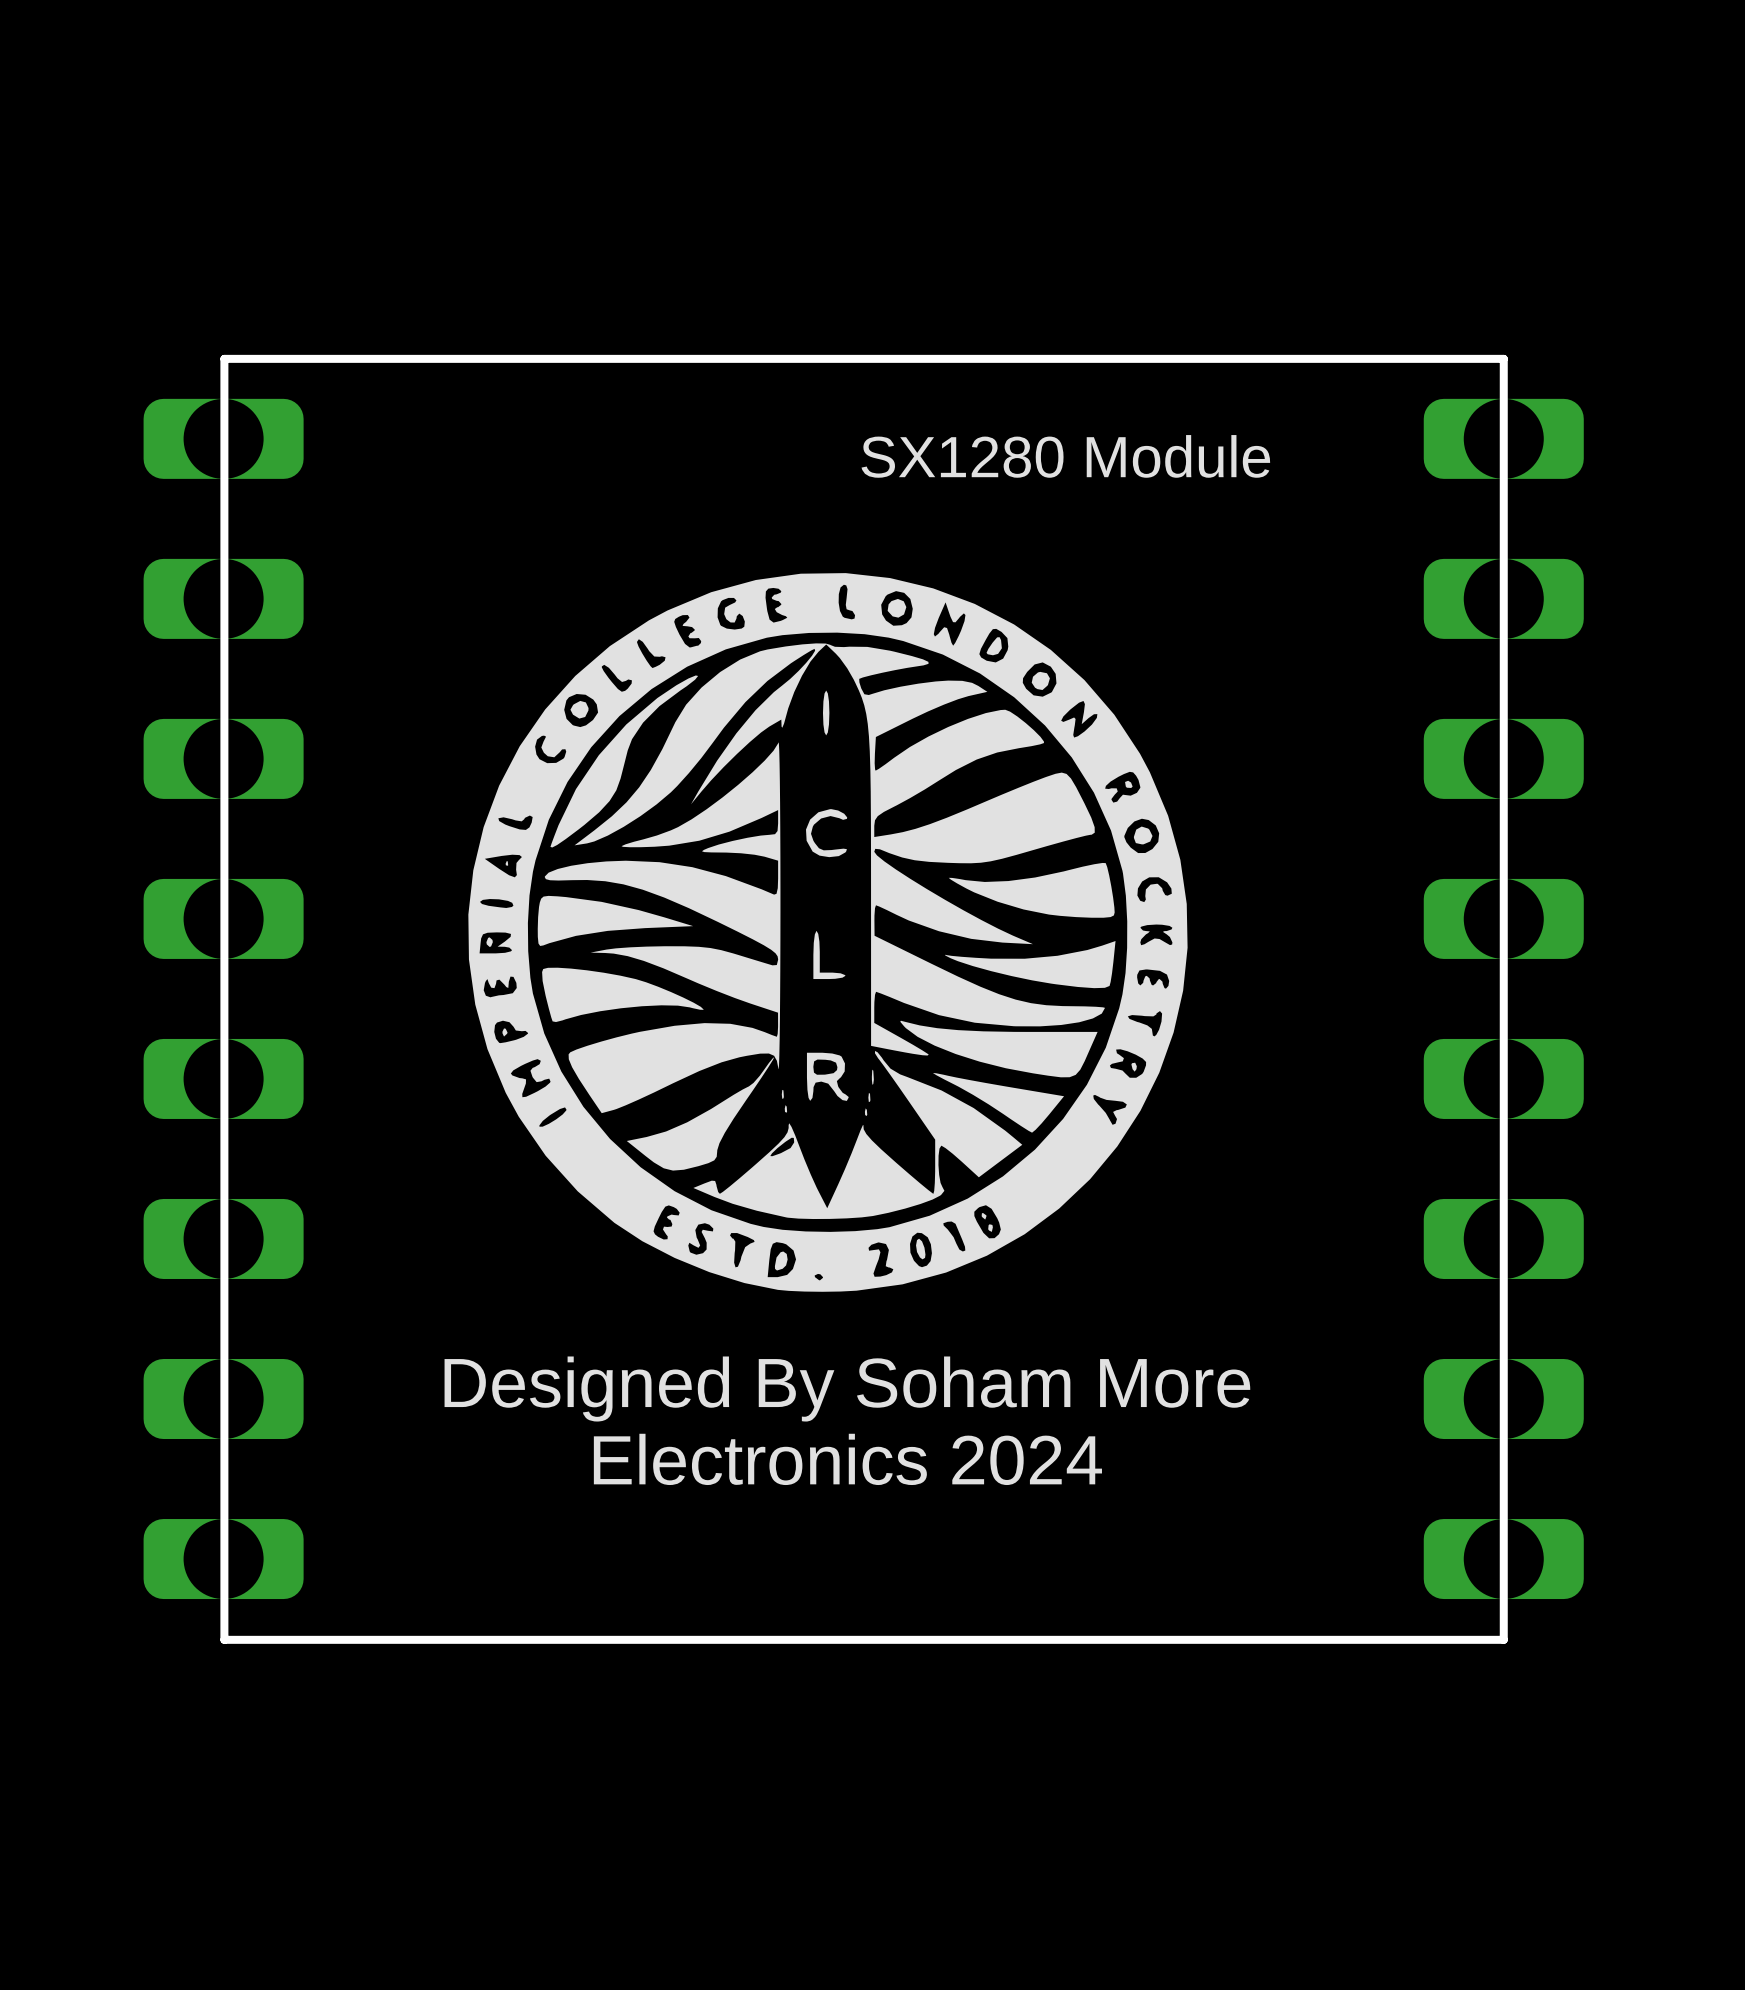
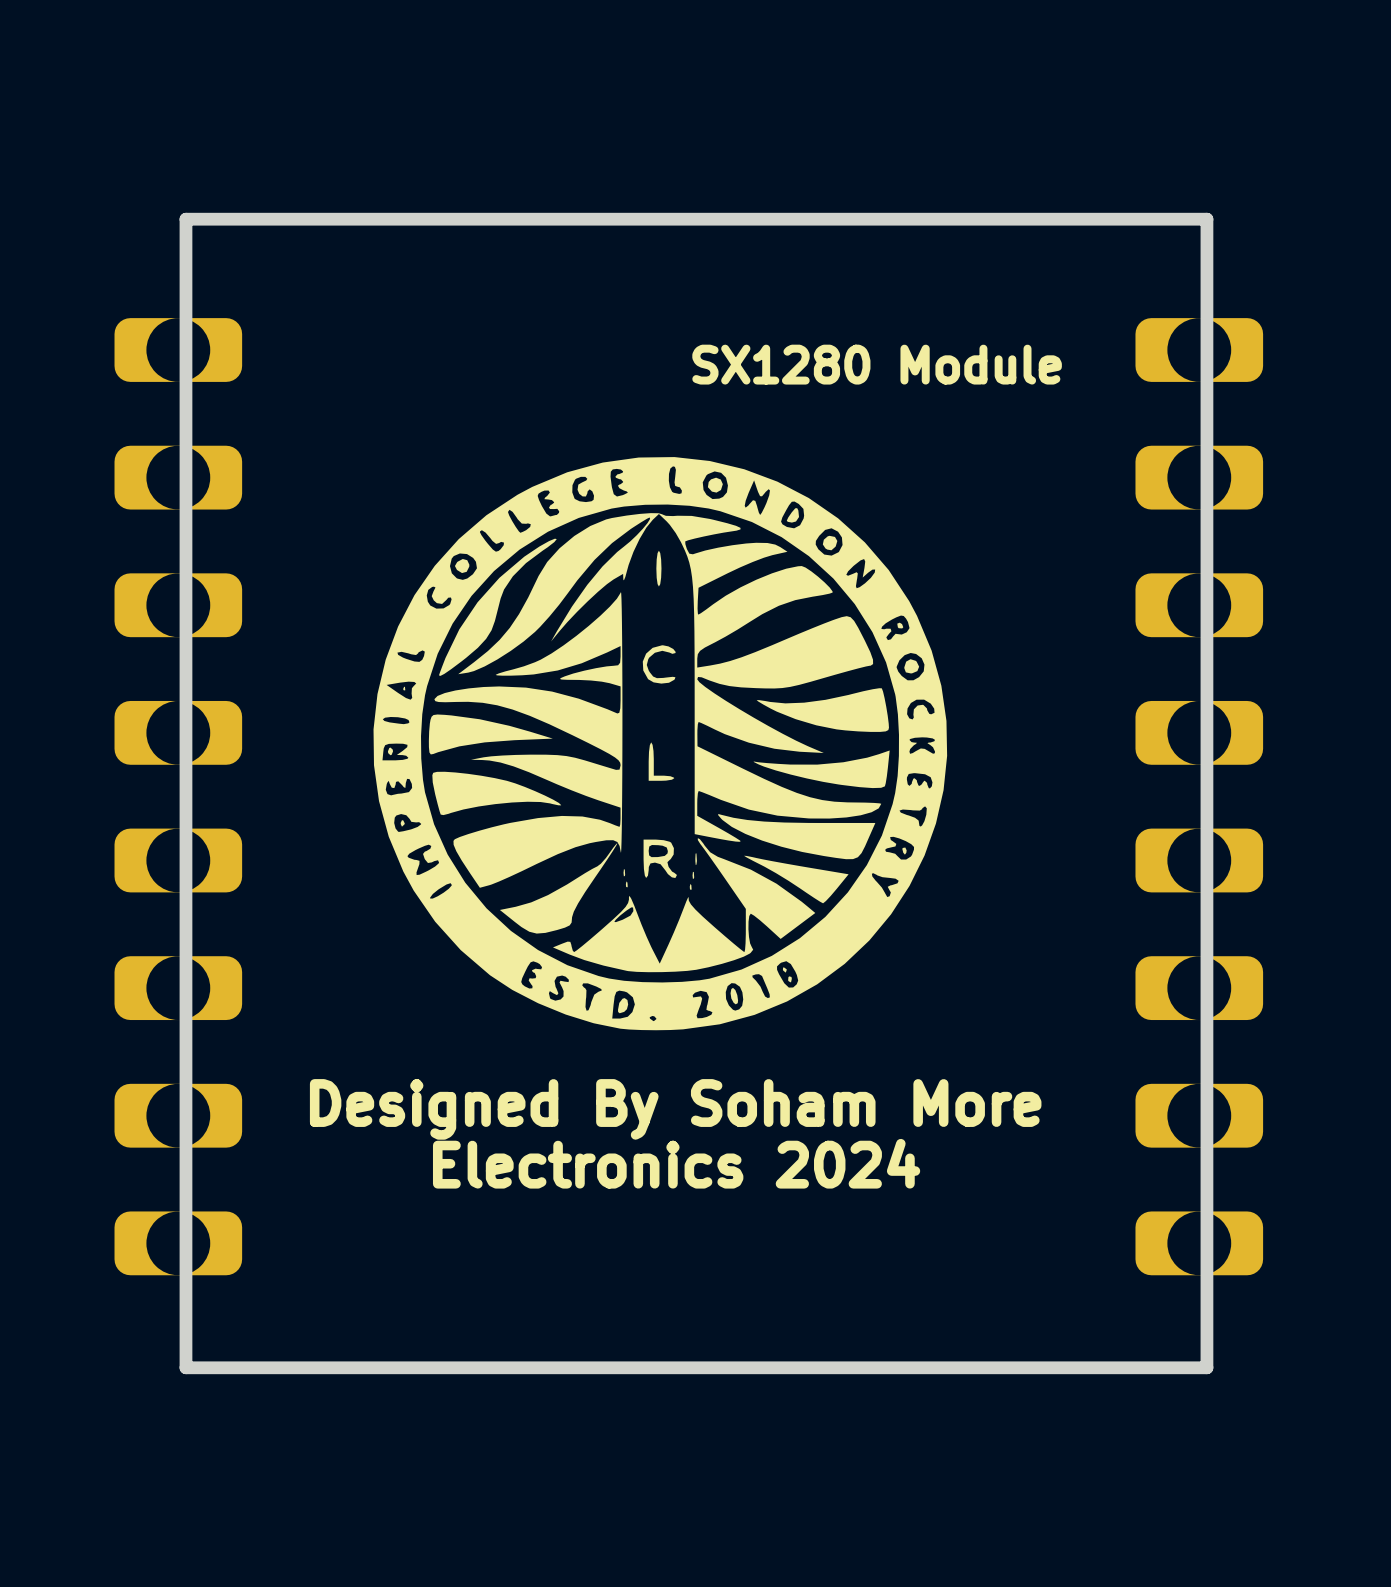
board edge: (1503, 358) (224, 358) (224, 1639) (1503, 1639) (1503, 358) -> (1206, 219) (1206, 1367) (185, 1367) (185, 219) (1206, 219)

